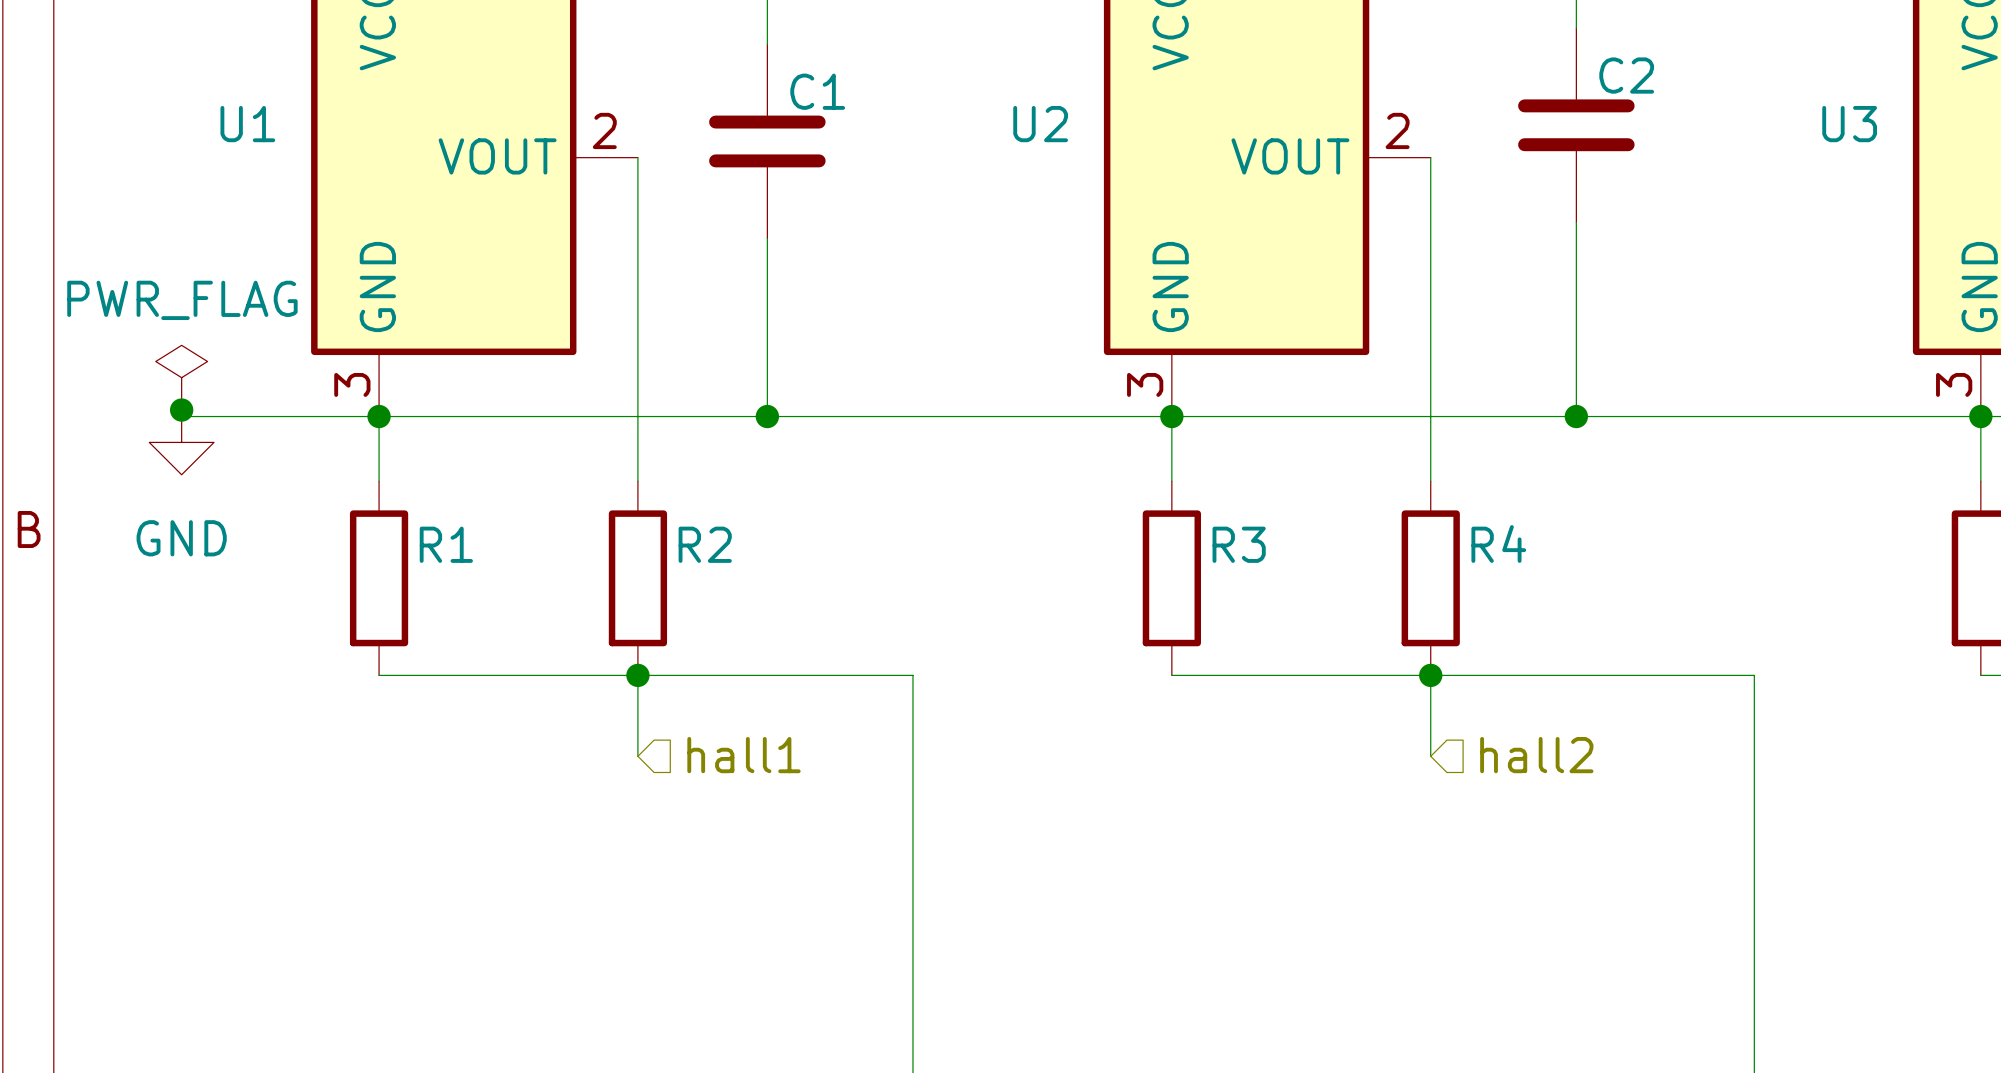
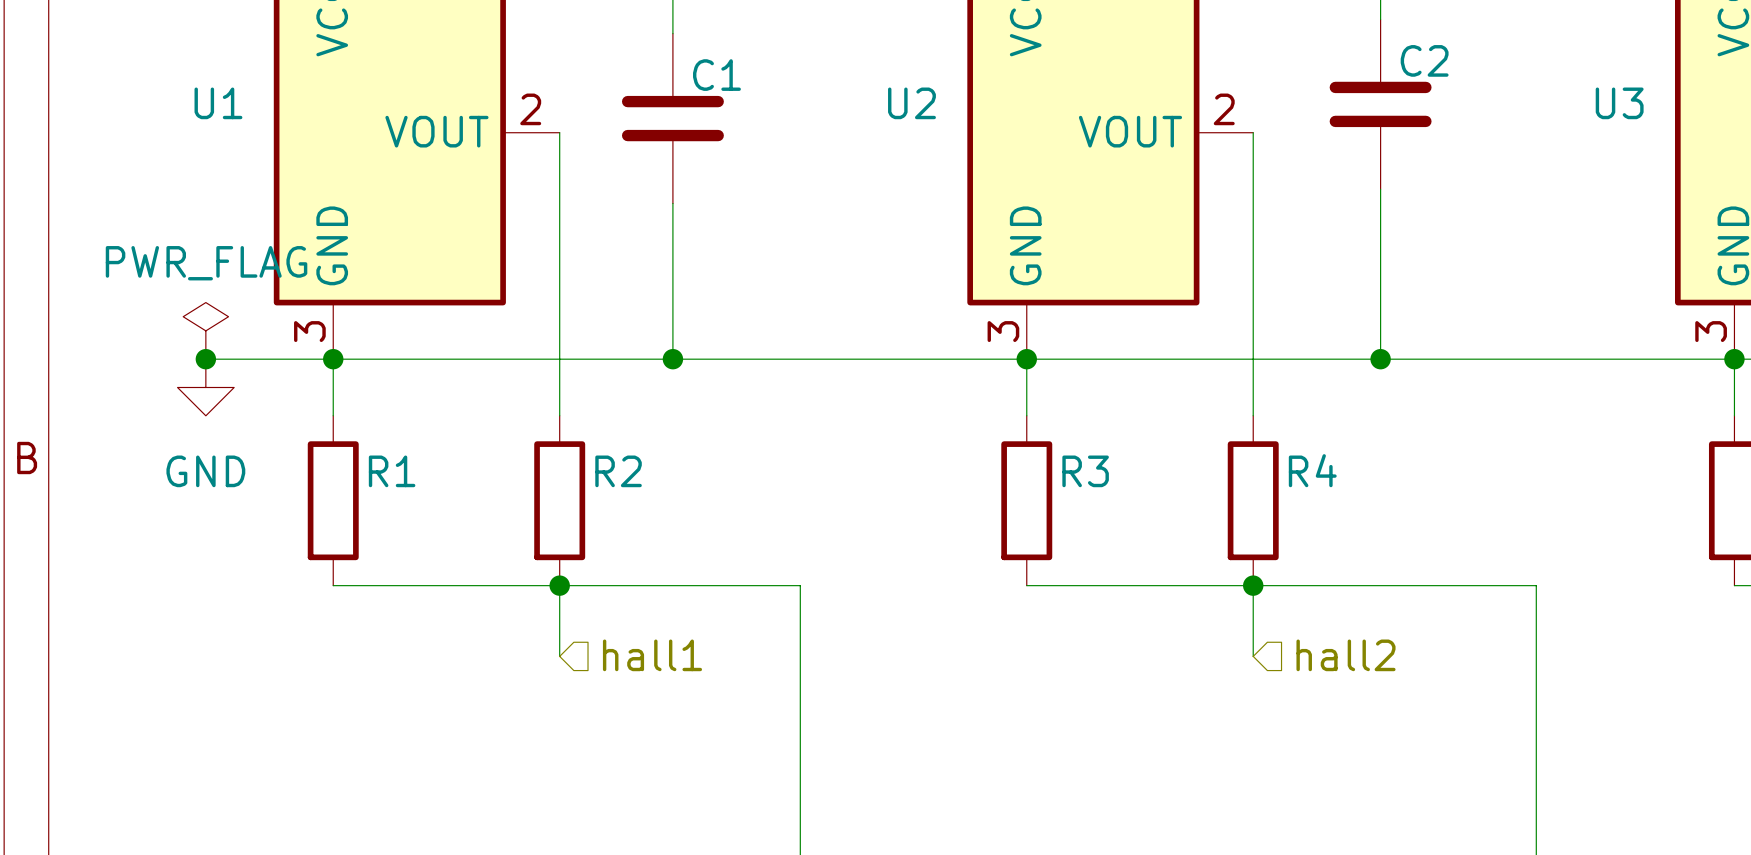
power symbol position: PWR_FLAG (181, 377) -> PWR_FLAG (205, 330)
wire: (181, 410) (188, 410) (188, 416) (233, 416) -> none
junction position: (181, 410) -> (205, 359)
power symbol position: GND (181, 442) -> GND (205, 387)

